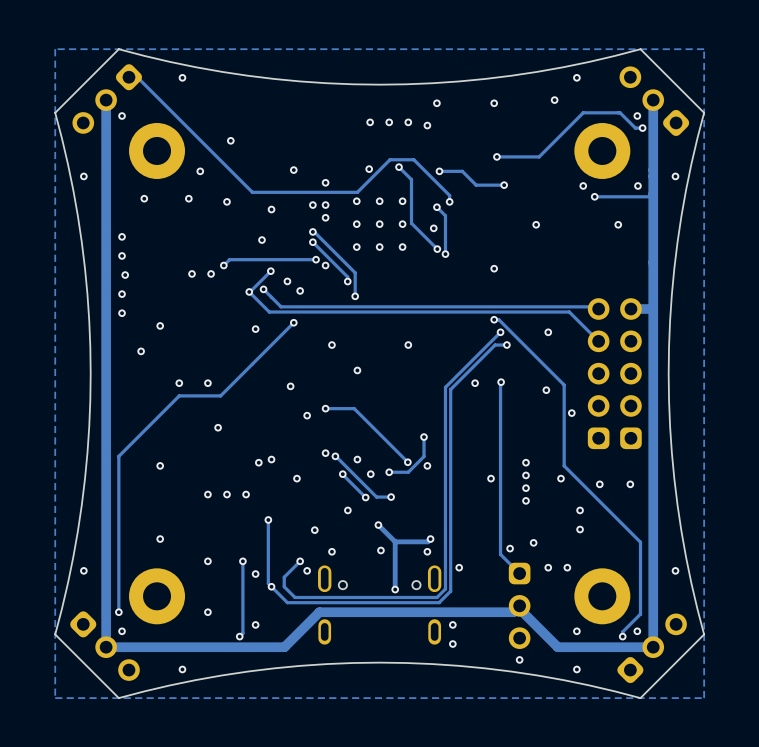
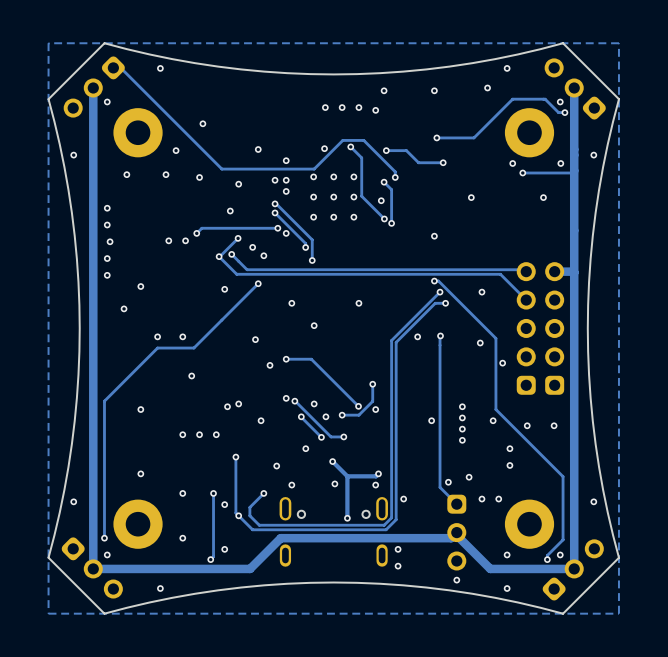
via: (307, 570) -> none

